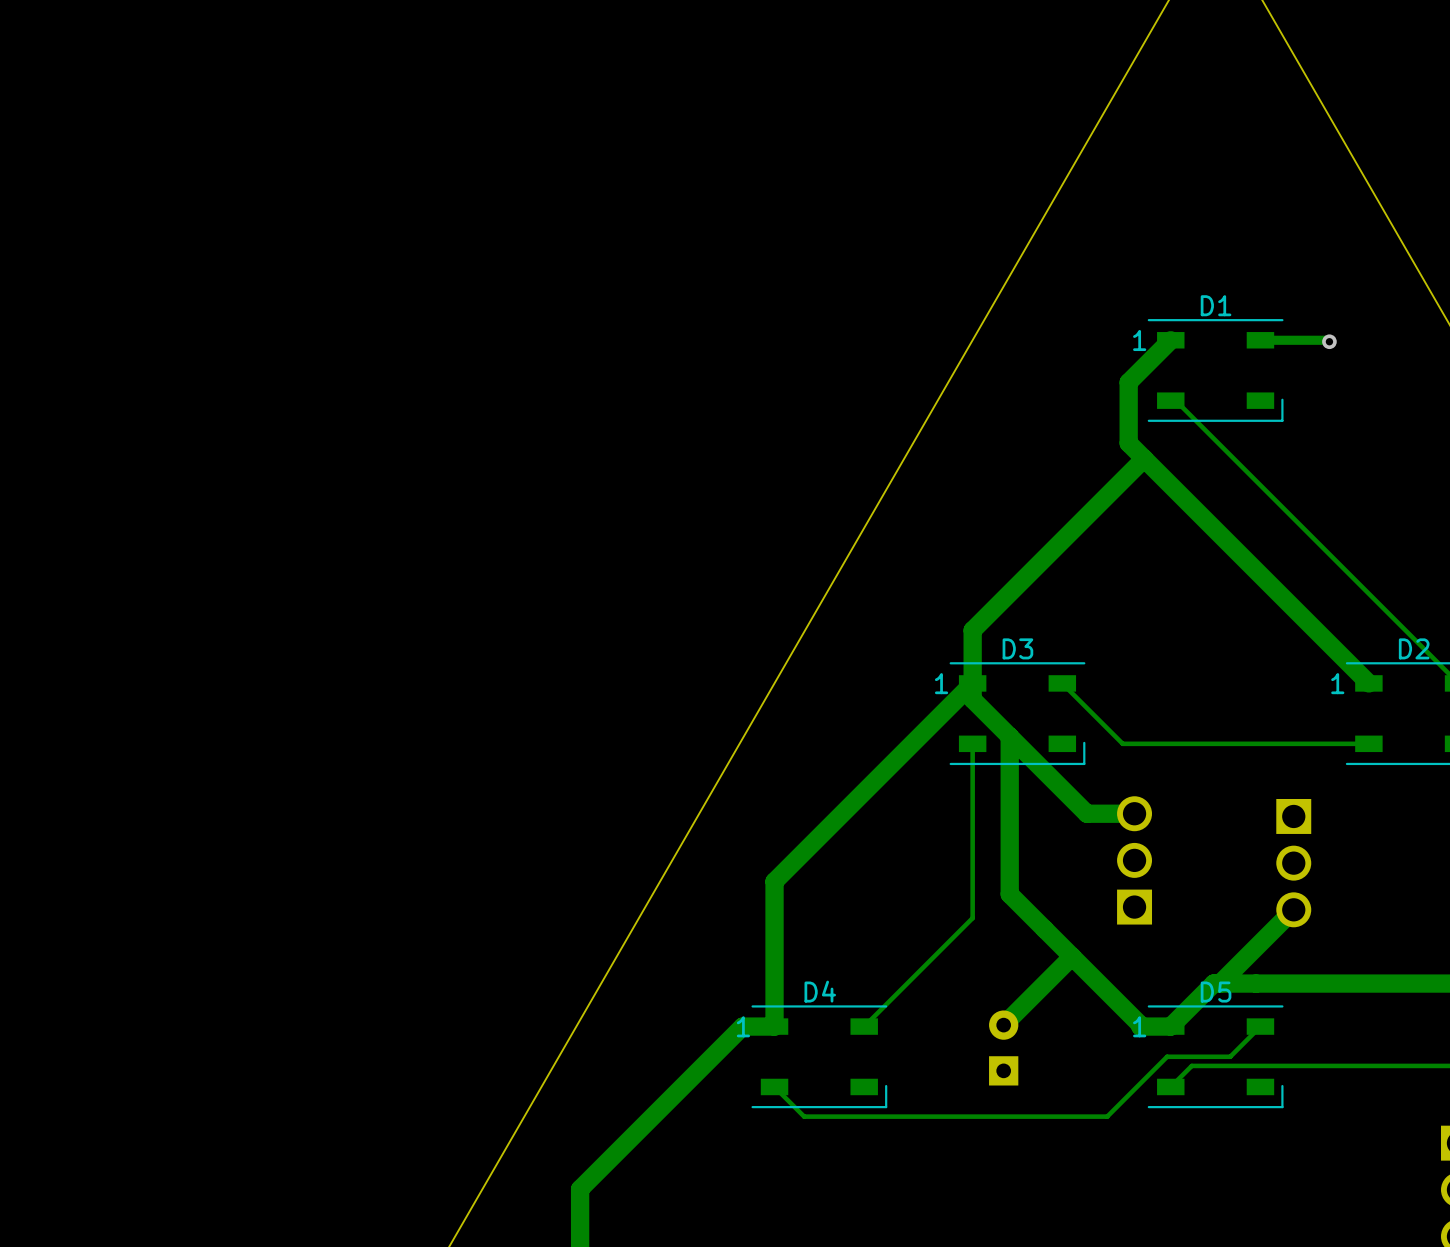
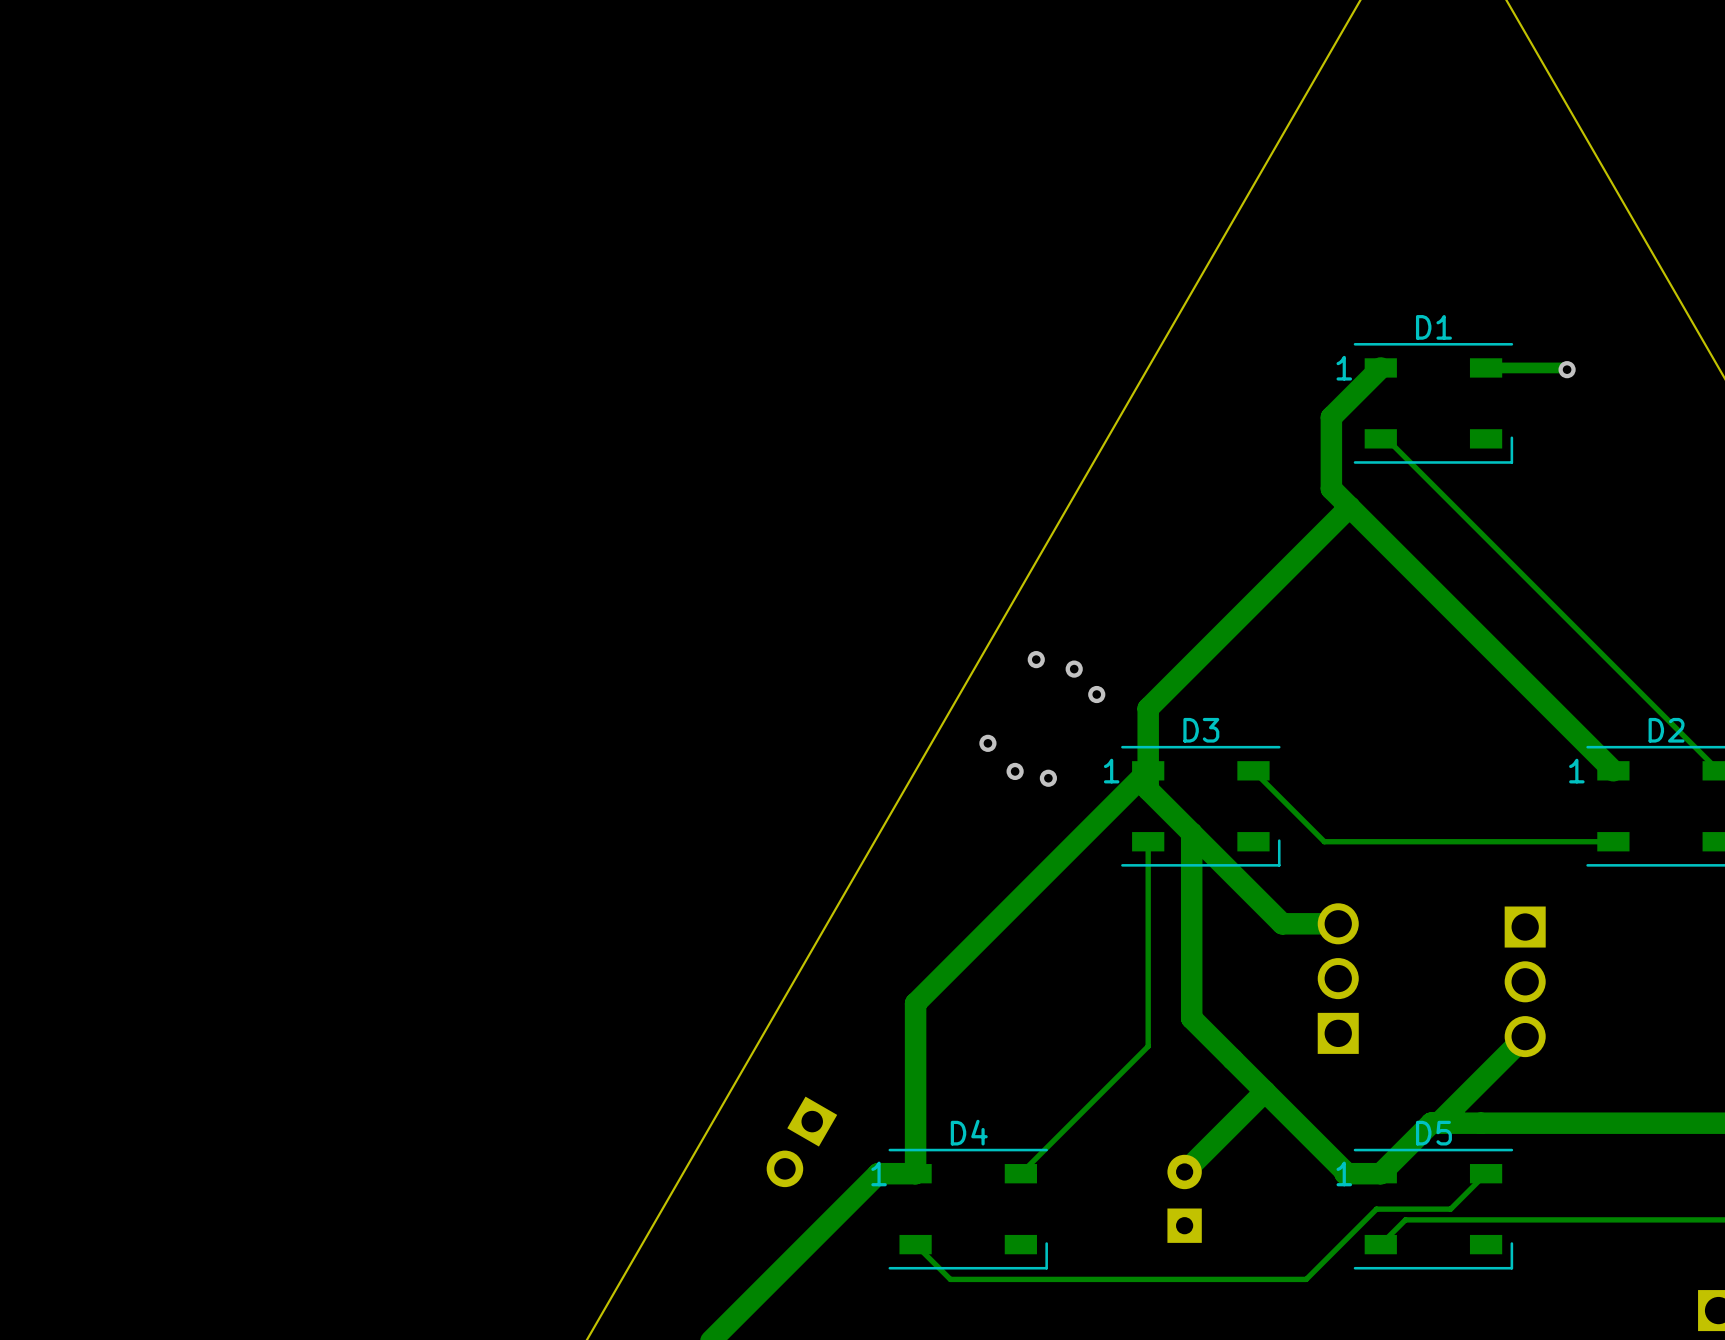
via: none -> (1036, 659)
via: none -> (1074, 669)
via: none -> (1096, 694)
via: none -> (987, 743)
via: none -> (1015, 771)
via: none -> (1048, 778)
part: none -> (801, 1141)

